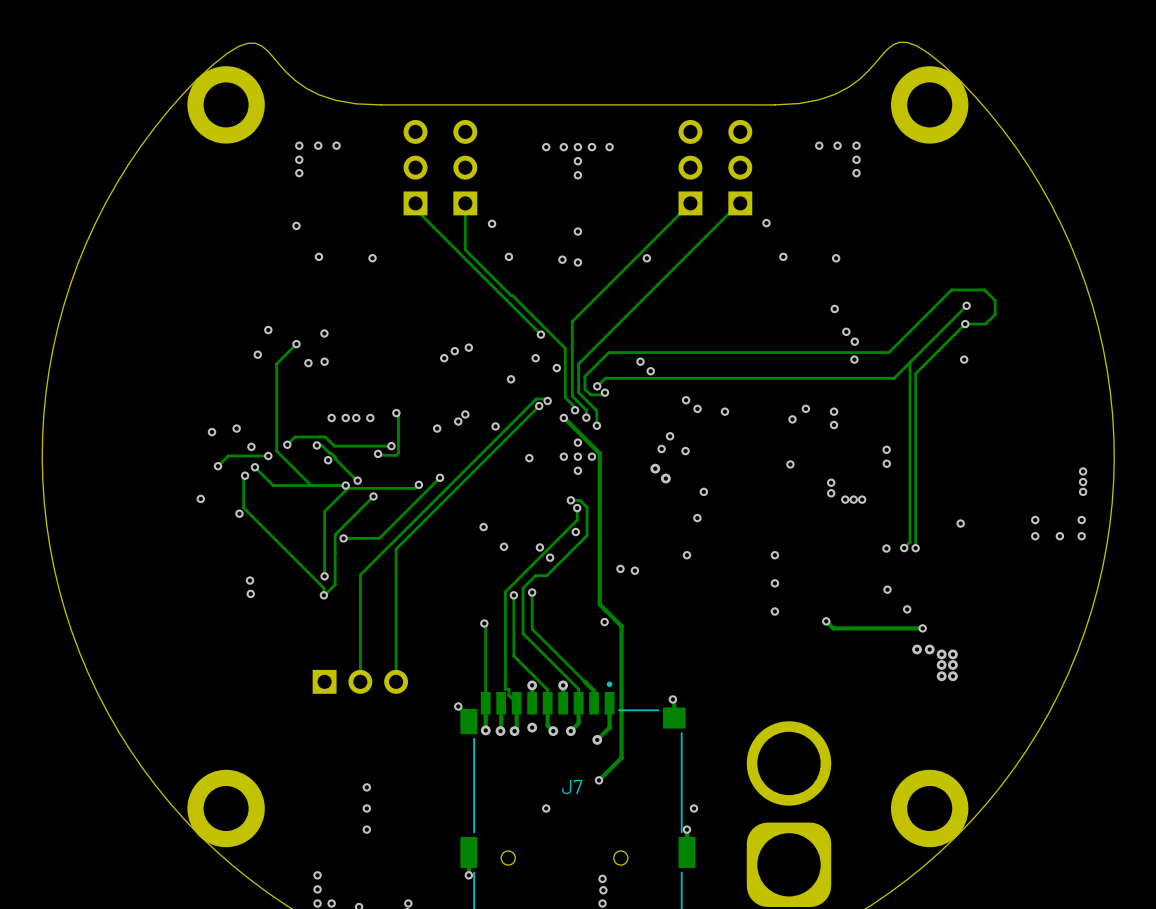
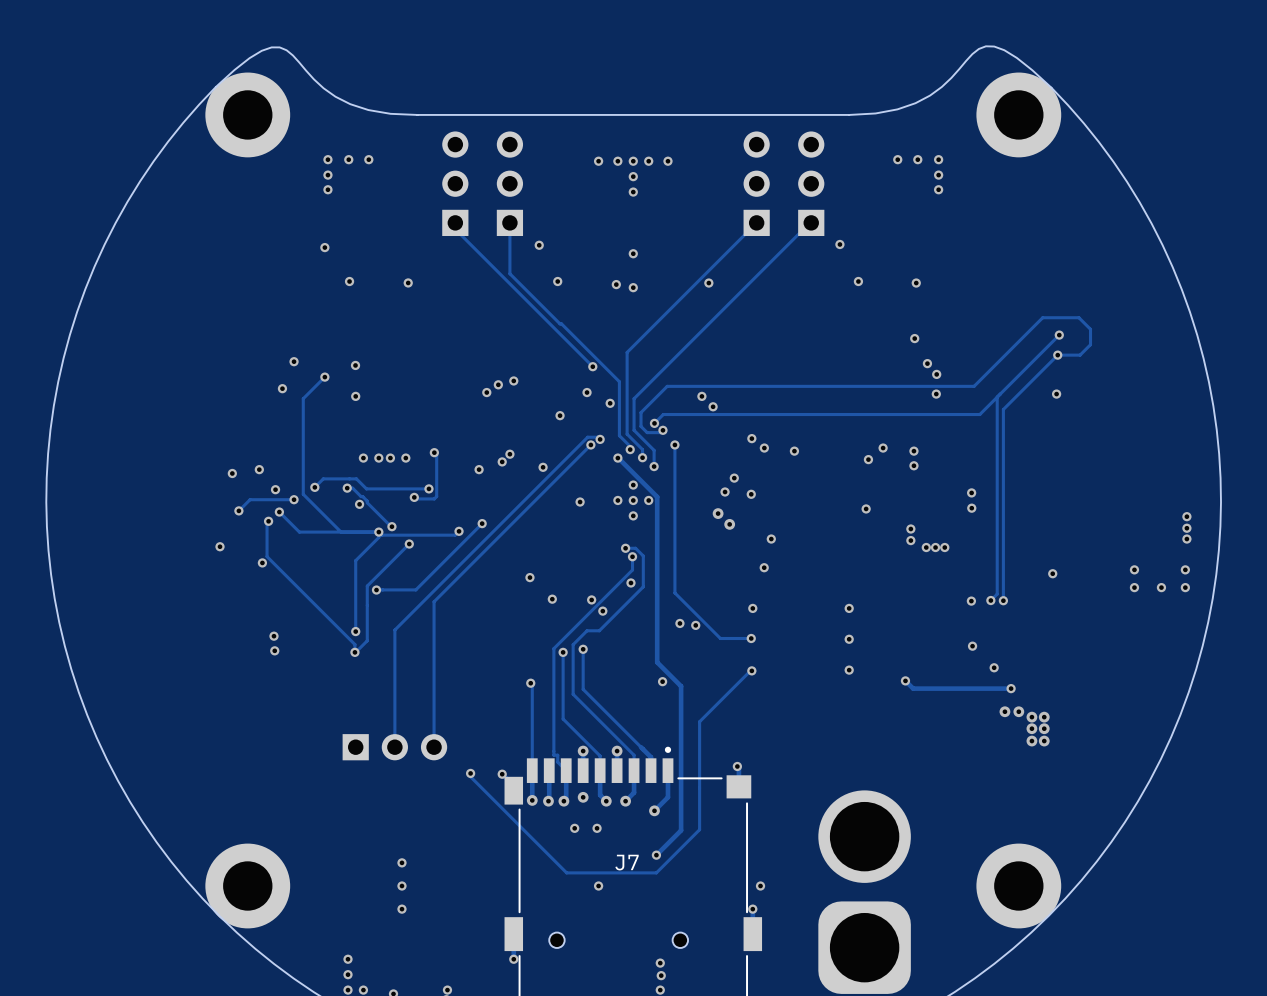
via: (308, 363) -> none
track: none -> (674, 444) (674, 593) (720, 638) (751, 638)
via: none -> (674, 444)
via: none -> (751, 638)
track: none -> (751, 670) (699, 721) (699, 829) (656, 872) (566, 872) (470, 776) (470, 773)
via: none -> (751, 670)
via: none -> (470, 773)
via: none -> (574, 828)
via: none -> (597, 828)

